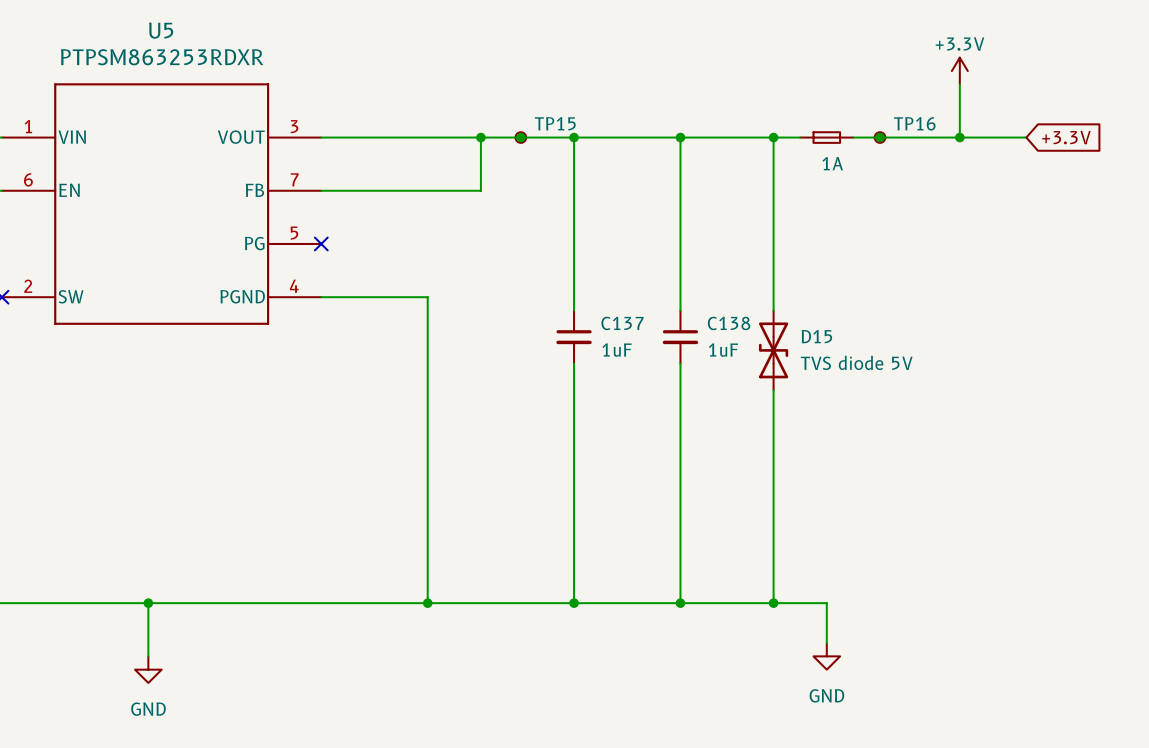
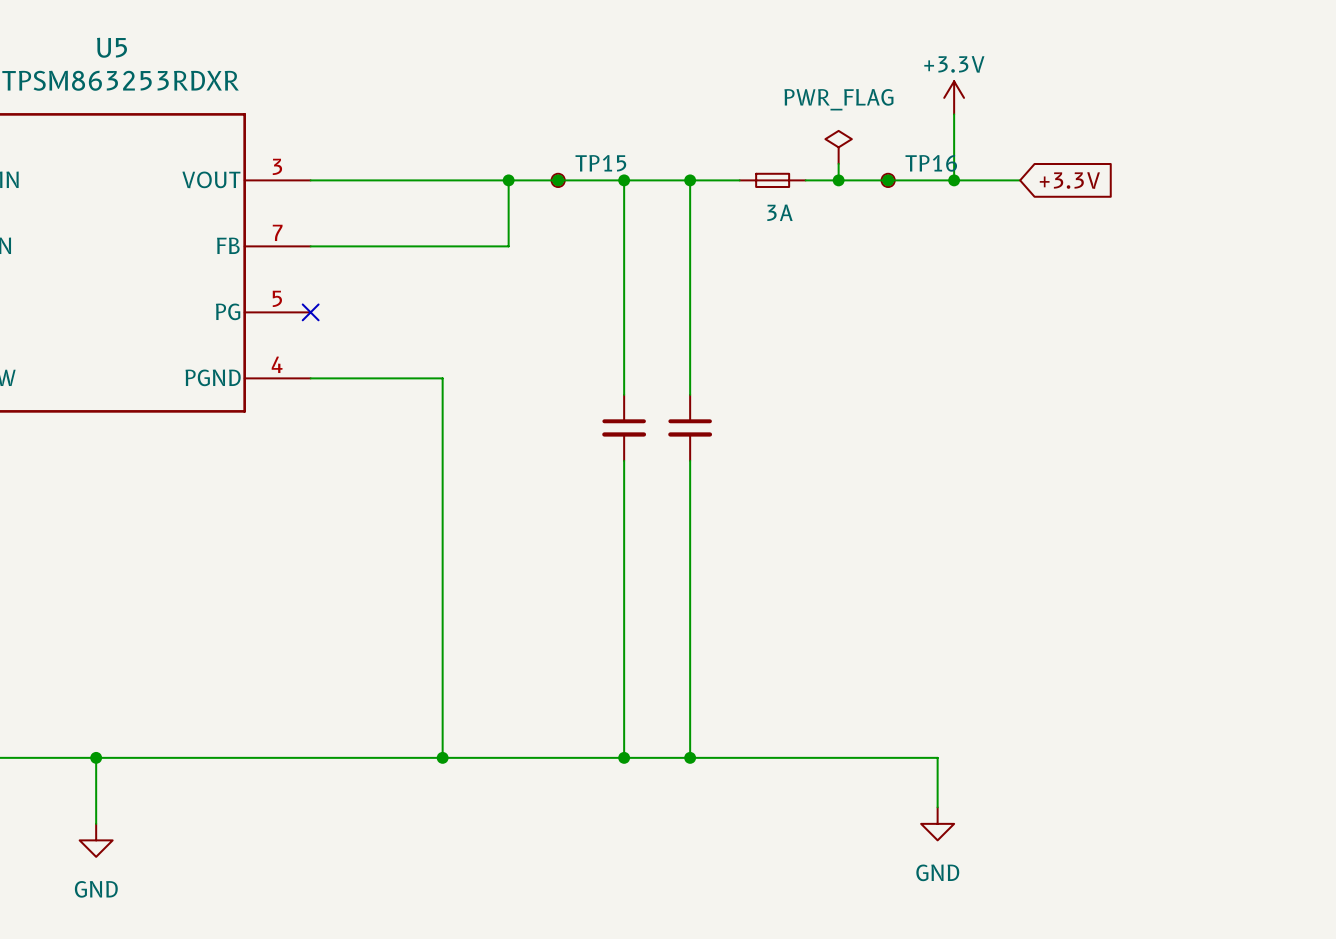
power symbol position: +3.3V (959, 71) -> +3.3V (954, 97)
wire: (959, 84) (959, 137) -> (954, 114) (954, 180)
power symbol: none -> PWR_FLAG (838, 147)
wire: none -> (838, 163) (838, 180)
junction: none -> (690, 180)
wire: (680, 137) (680, 310) -> (690, 180) (690, 394)
junction: (680, 137) -> none
part: none -> 3A (772, 180)
junction: none -> (838, 180)
wire: (773, 137) (773, 310) -> none
junction: (773, 137) -> none
junction: none -> (888, 180)
part: 1A (826, 137) -> none
junction: none -> (954, 180)
junction: (880, 137) -> none
TP16 position: (880, 137) -> (888, 180)
wire: (893, 137) (1026, 137) -> none
junction: (959, 137) -> none
global label position: +3.3V (1066, 137) -> +3.3V (1069, 180)
C137 name: C137 (622, 323) -> none
part: none -> (690, 427)
C138: 1uF (680, 337) -> none
C137 value: 1uF (617, 350) -> none
D15: TVS diode 5V (773, 350) -> none
wire: (680, 363) (680, 603) -> (690, 460) (690, 757)
wire: (773, 390) (773, 603) -> none
junction position: (680, 603) -> (690, 757)
junction: (773, 603) -> none

